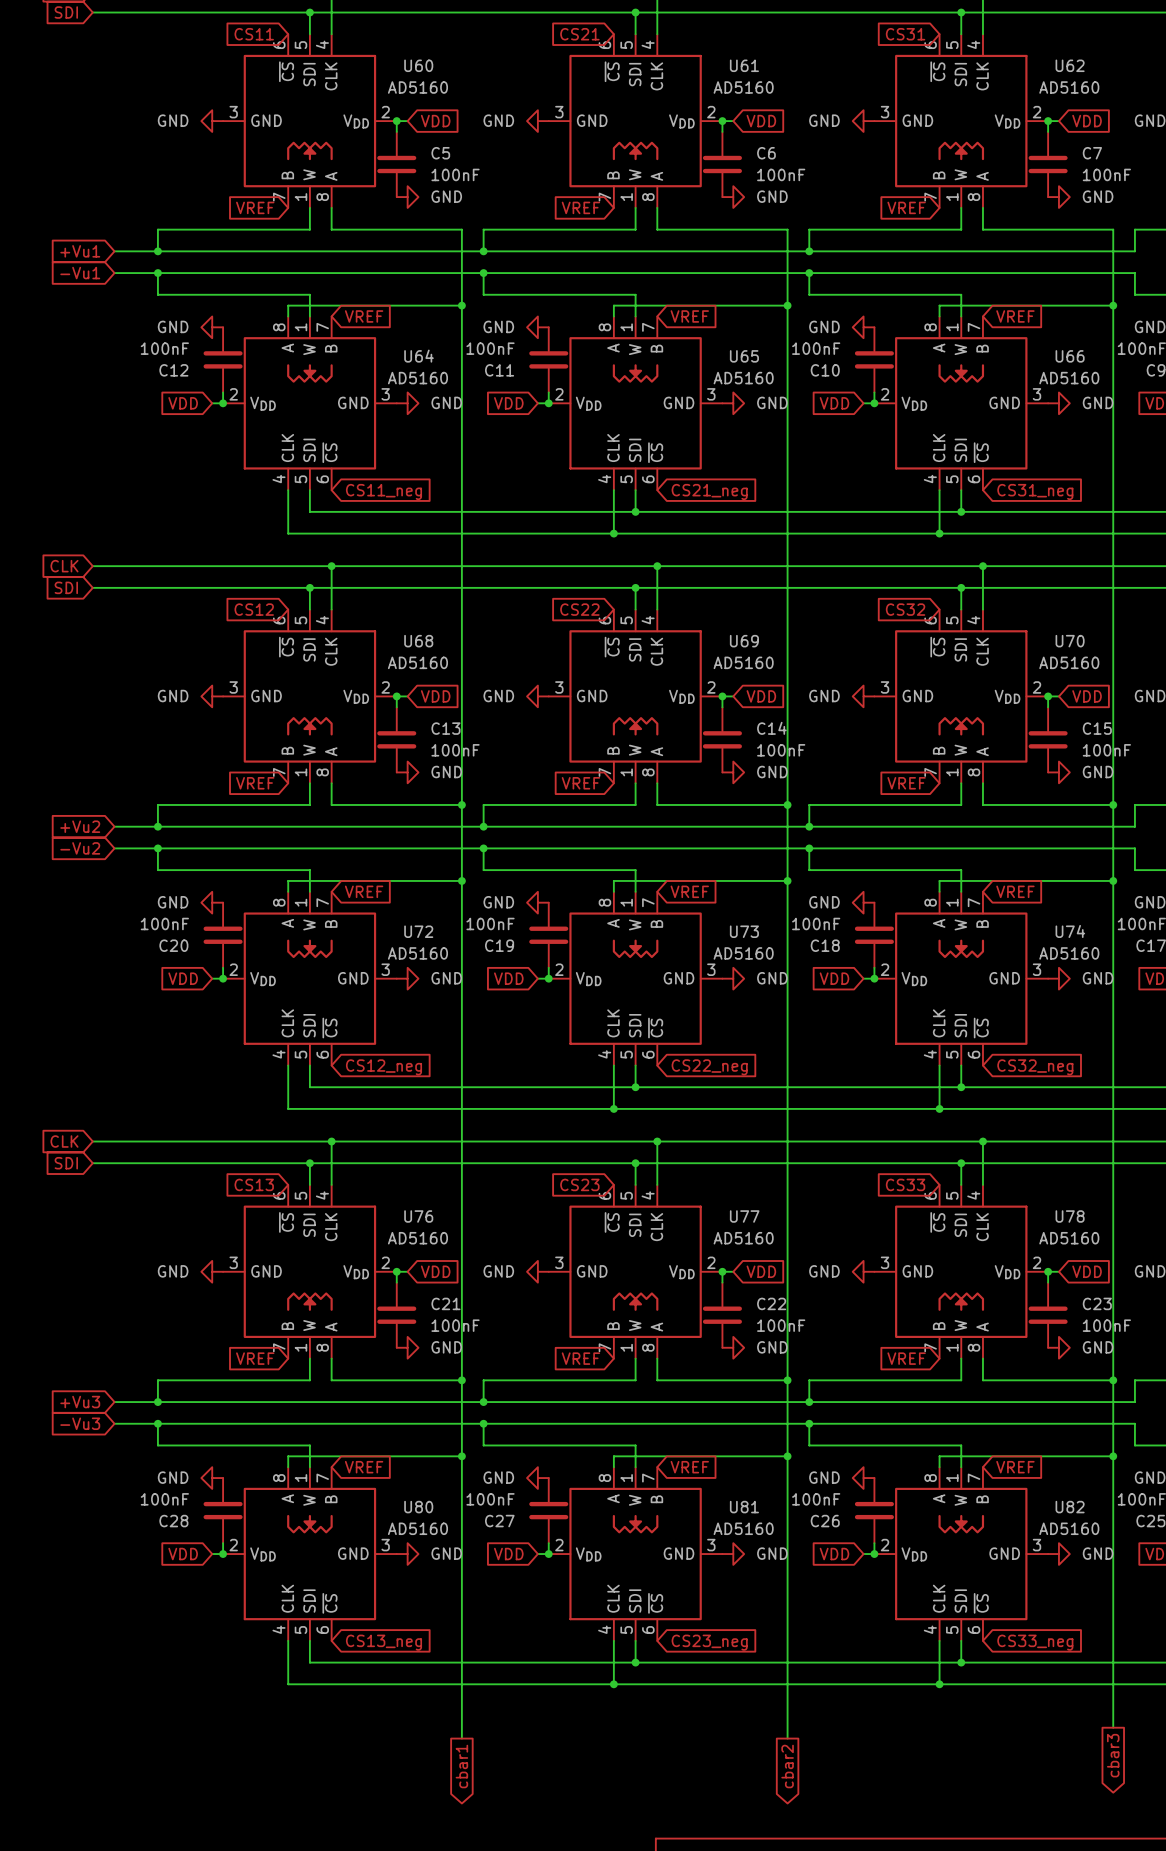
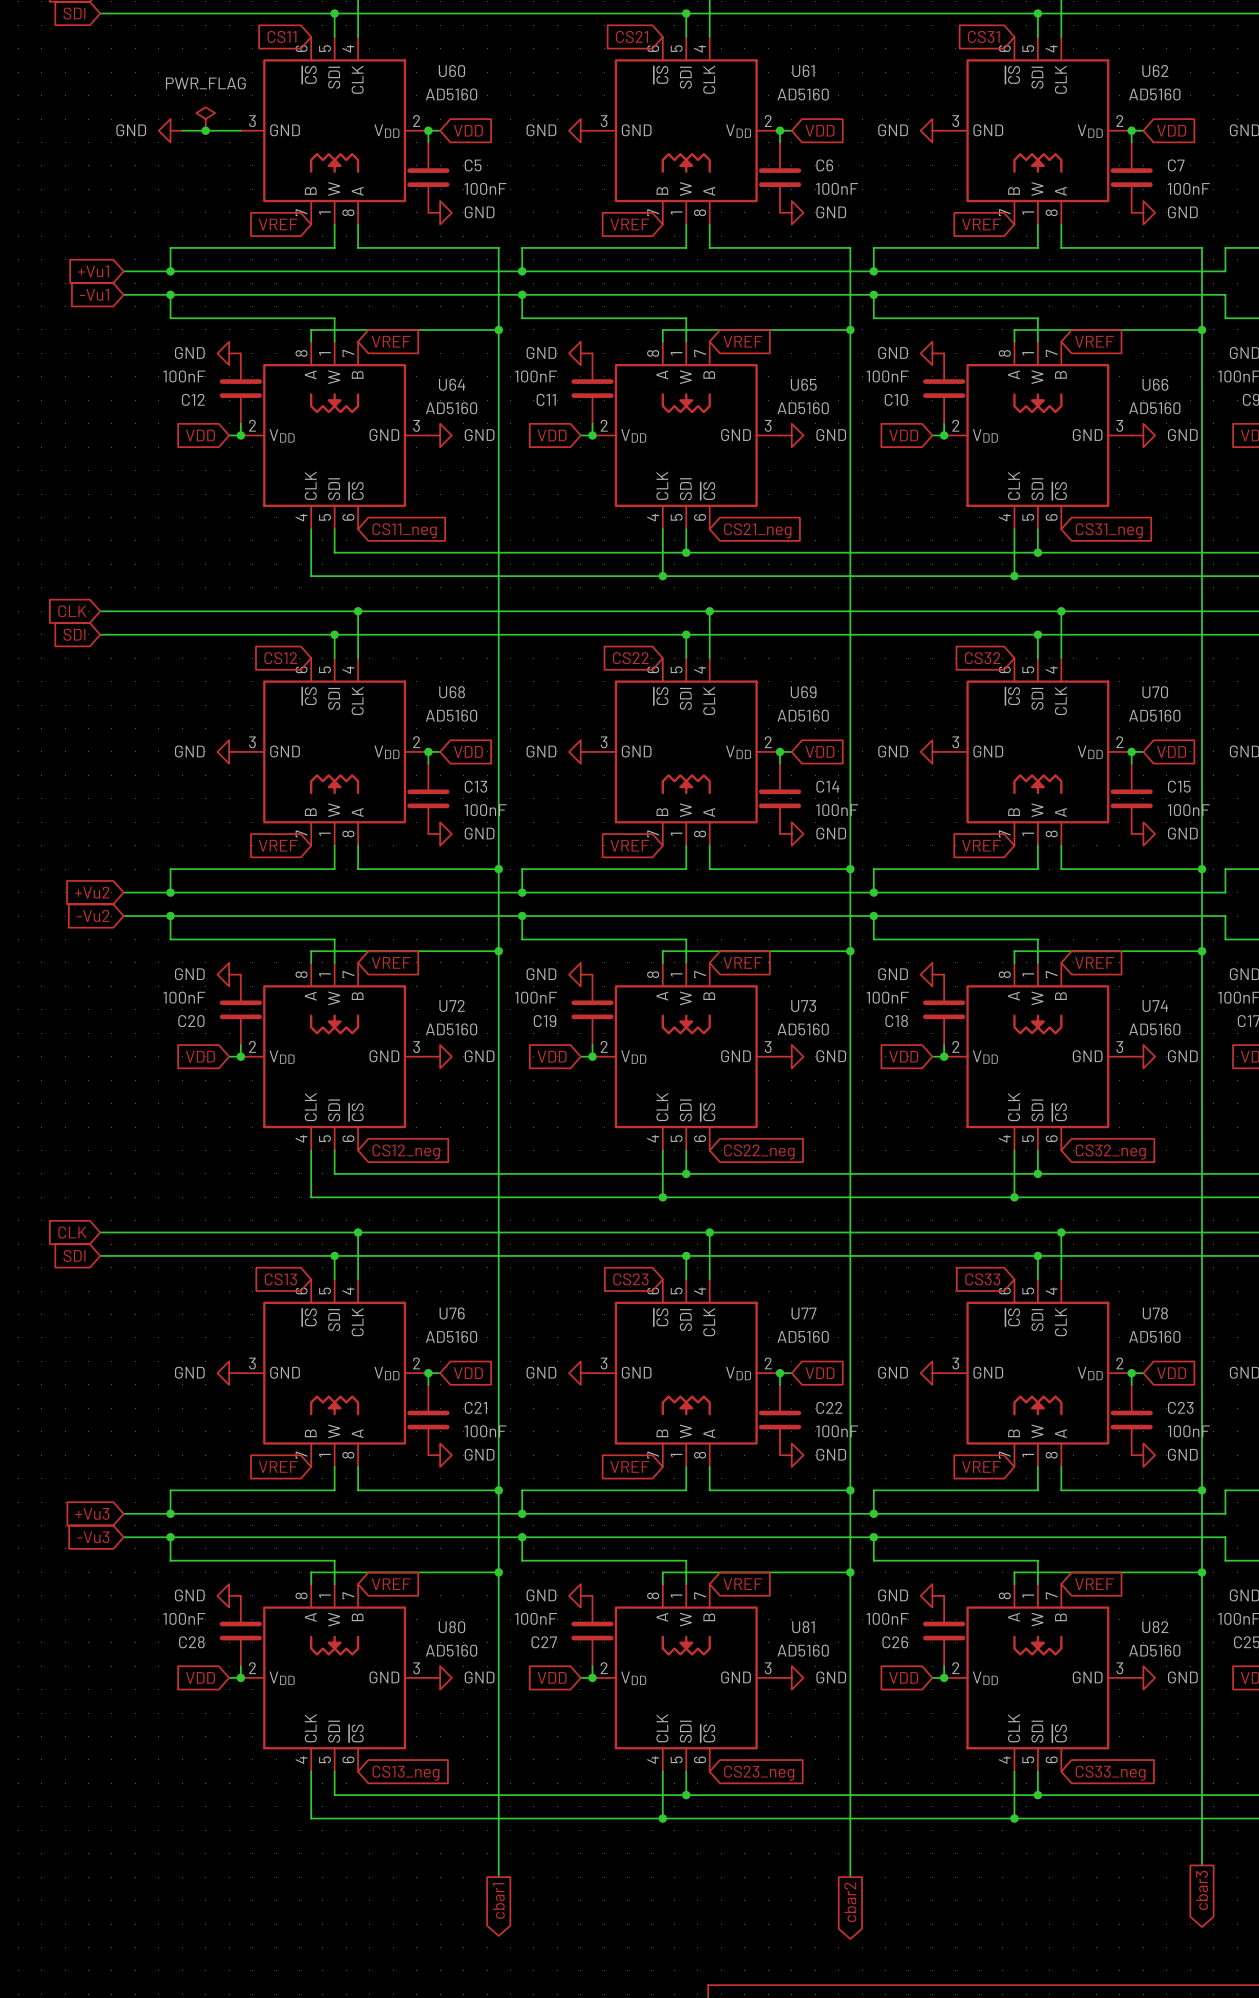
power symbol: none -> PWR_FLAG (205, 119)
wire: none -> (182, 130) (240, 130)
junction: none -> (205, 130)
power symbol position: GND (212, 121) -> GND (170, 130)

